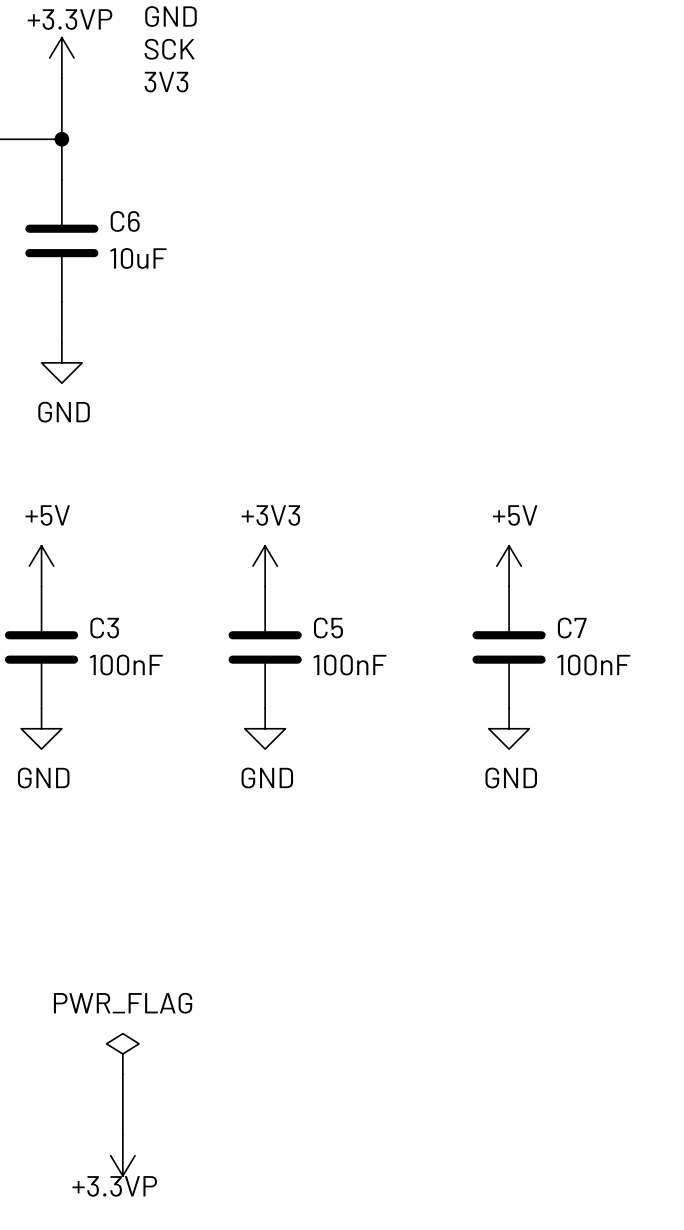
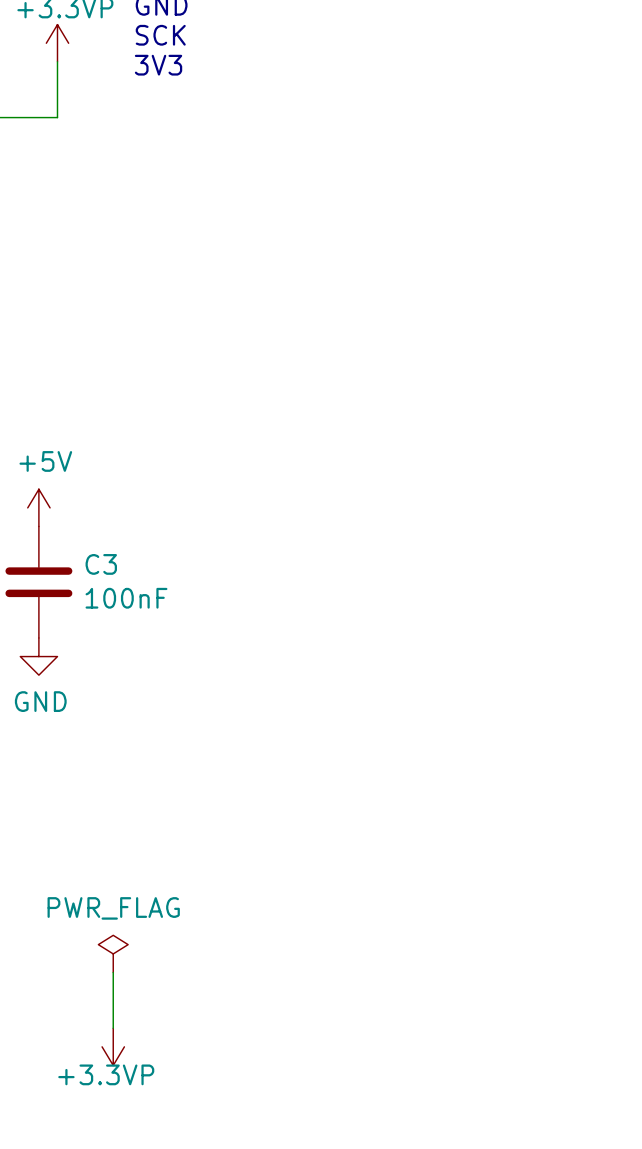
wire: (61, 139) (61, 179) -> none
junction: (61, 139) -> none
C6: 10uF (61, 240) -> none
wire: (61, 301) (61, 342) -> none
power symbol: GND (61, 362) -> none
power symbol: +3V3 (265, 566) -> none
power symbol: +5V (509, 566) -> none
C5: 100nF (265, 647) -> none
C7: 100nF (509, 647) -> none
power symbol: GND (265, 728) -> none
power symbol: GND (509, 728) -> none

